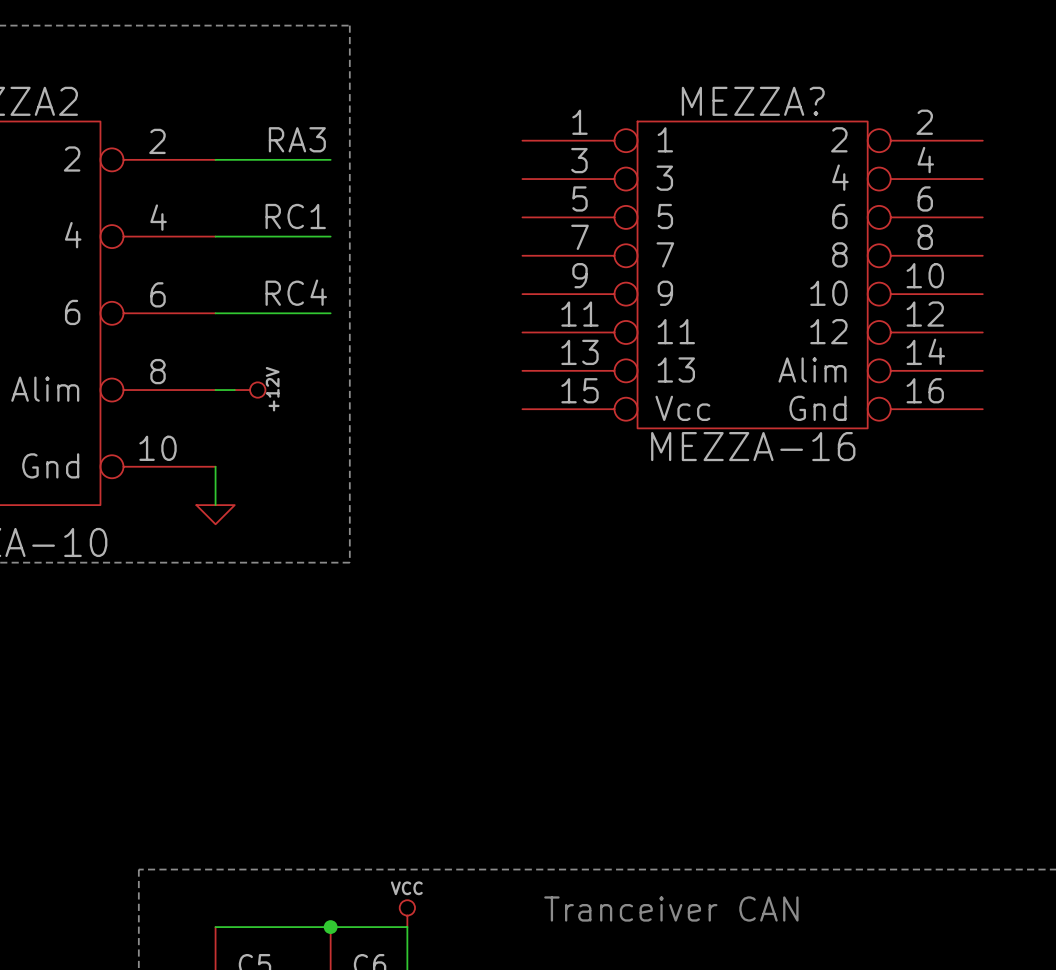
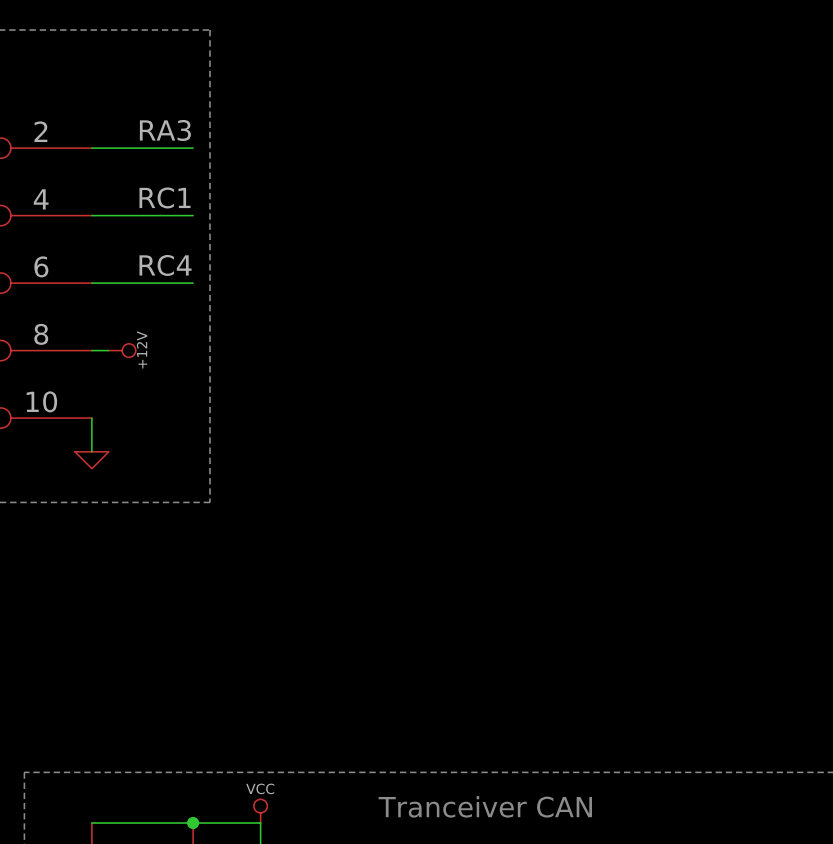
MEZZA?: MEZZA-16 (752, 274) -> none

